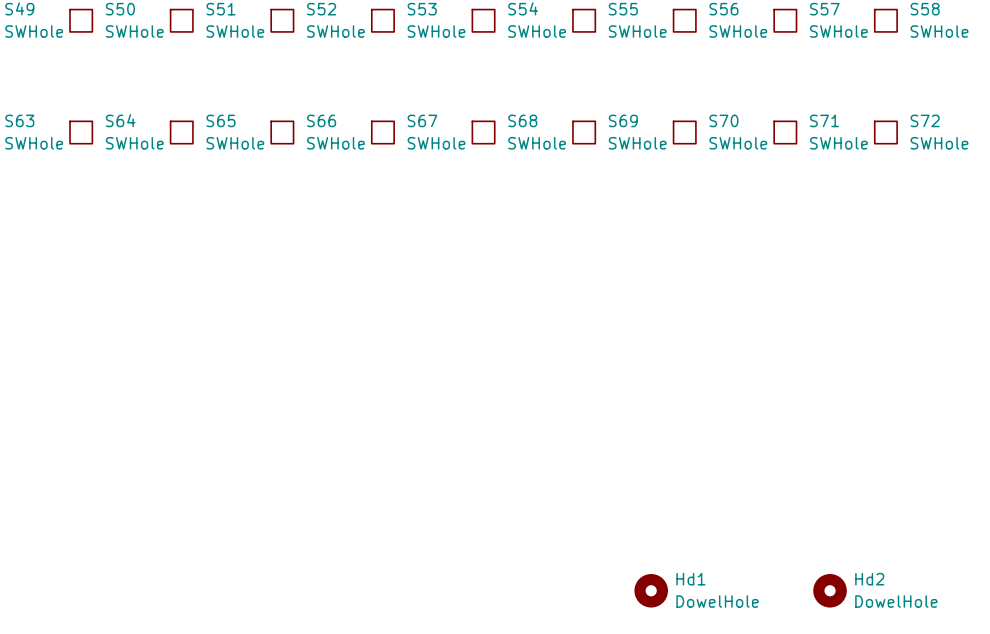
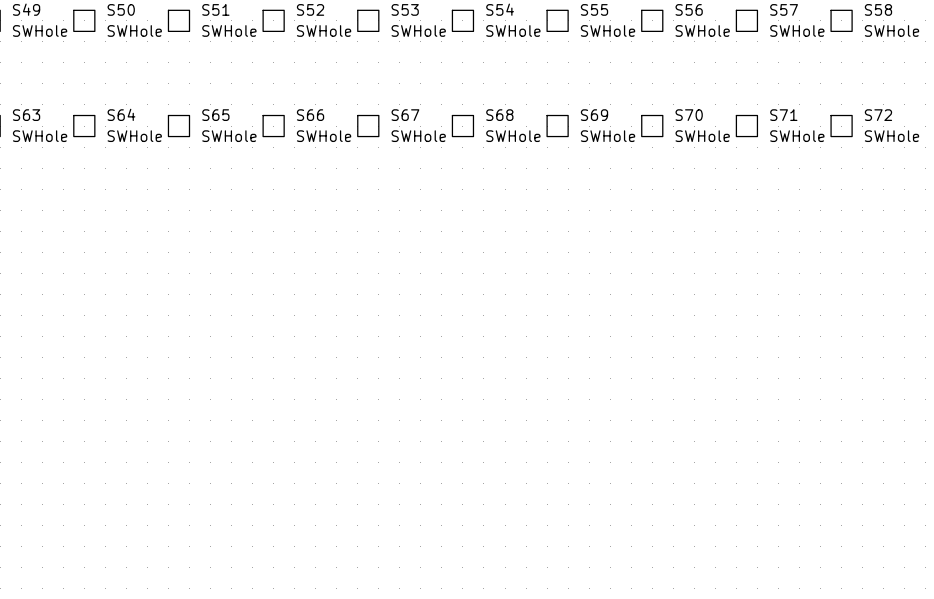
Hd1: DowelHole (651, 590) -> none
Hd2: DowelHole (830, 590) -> none

